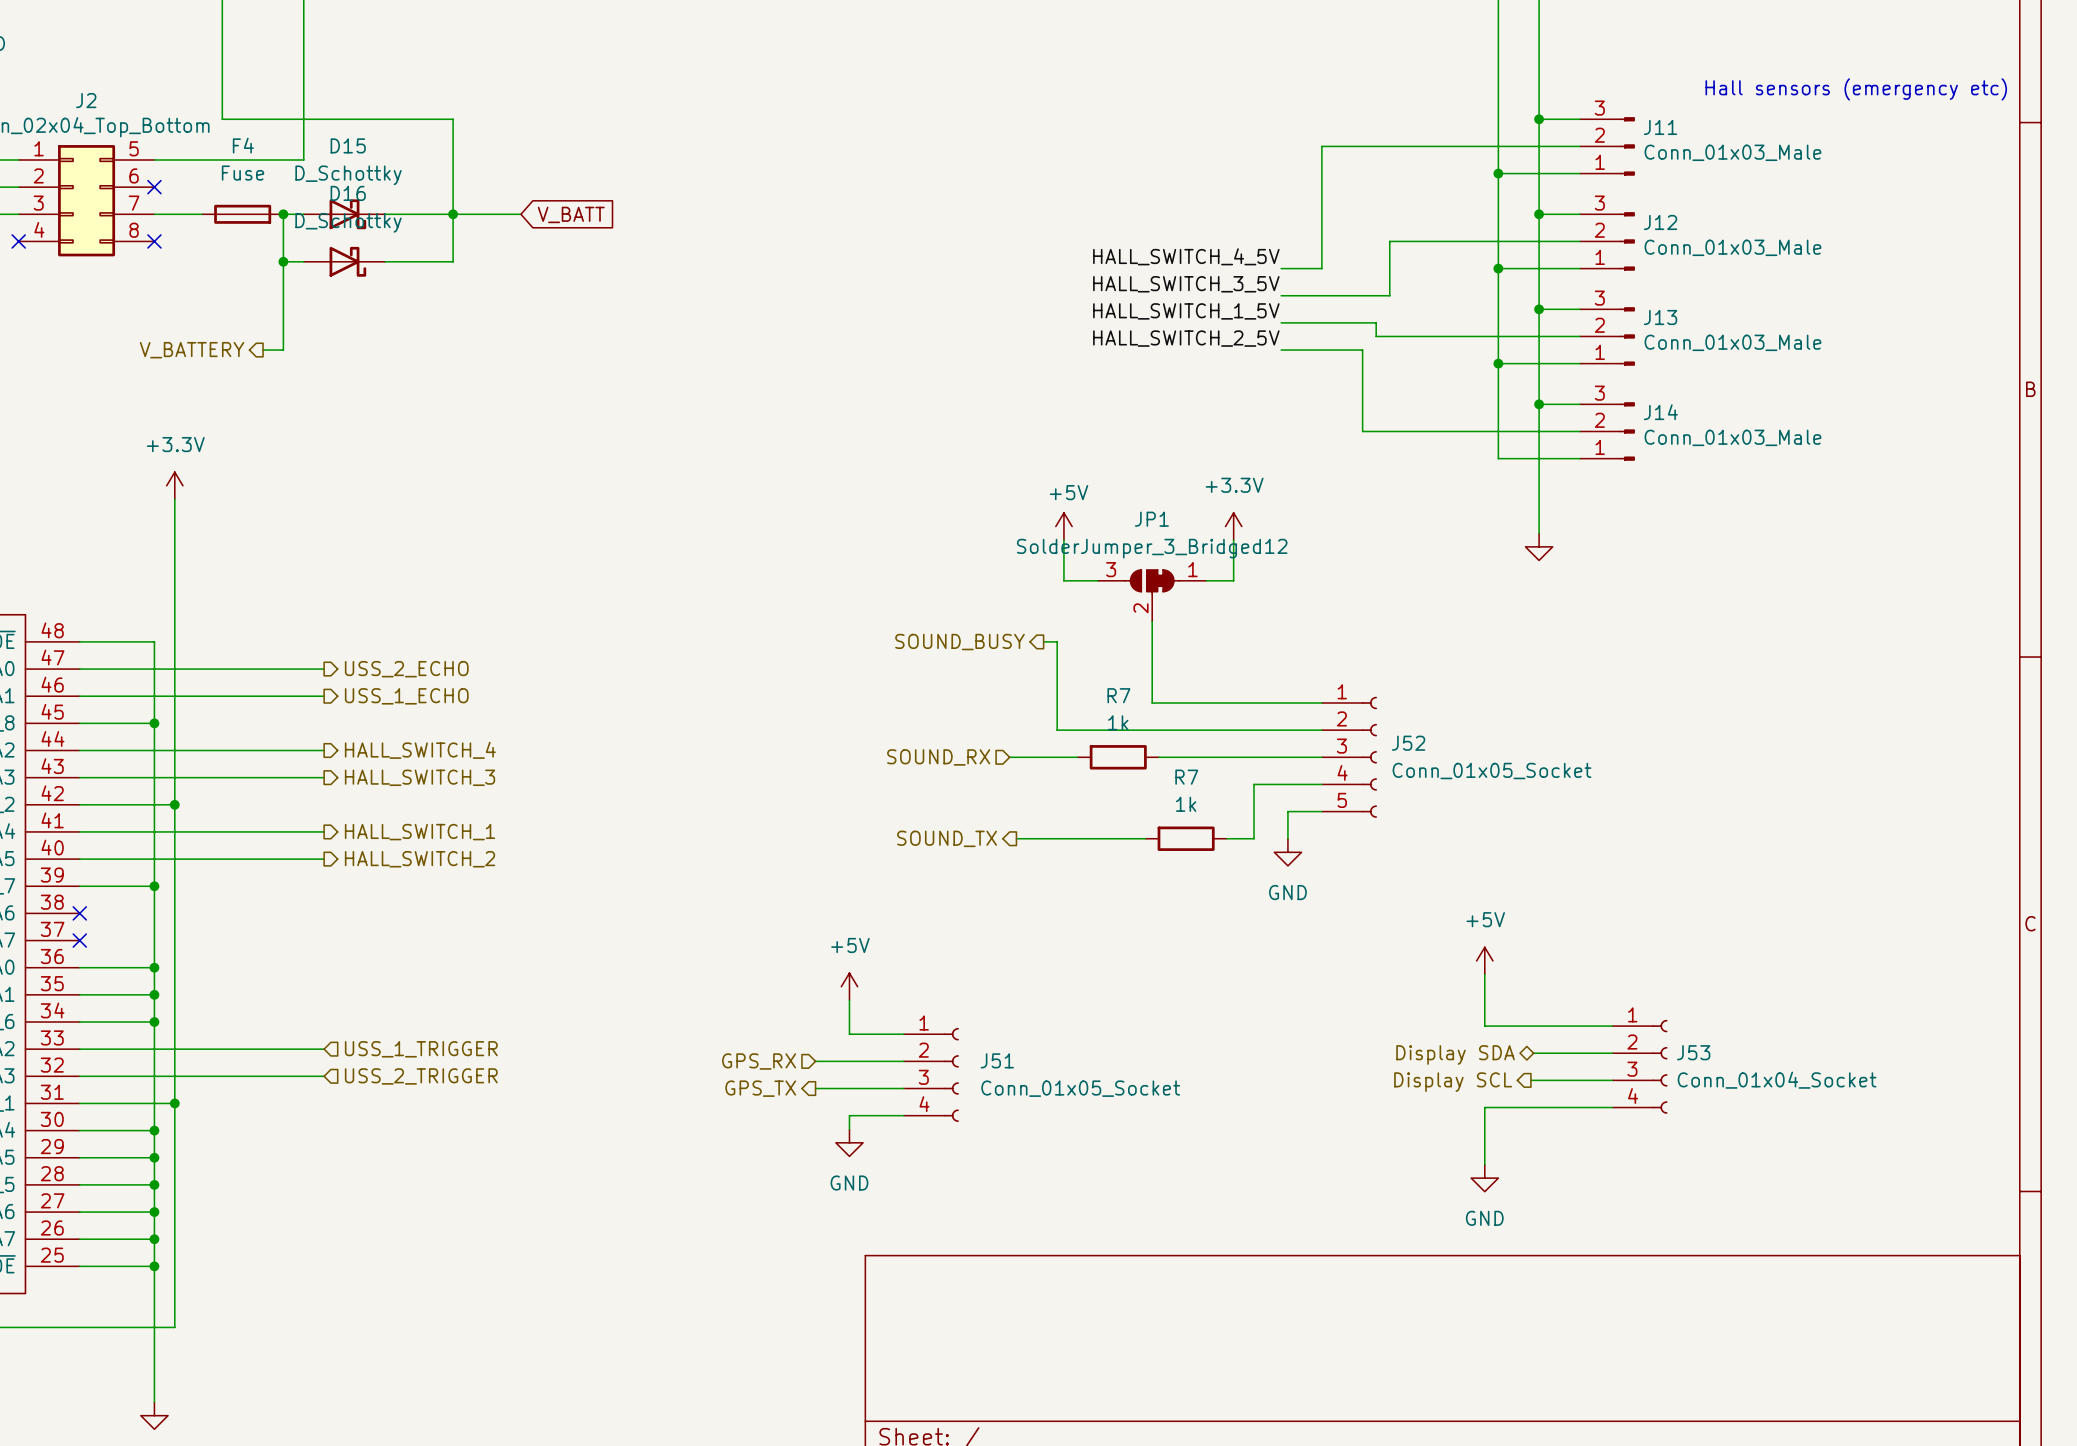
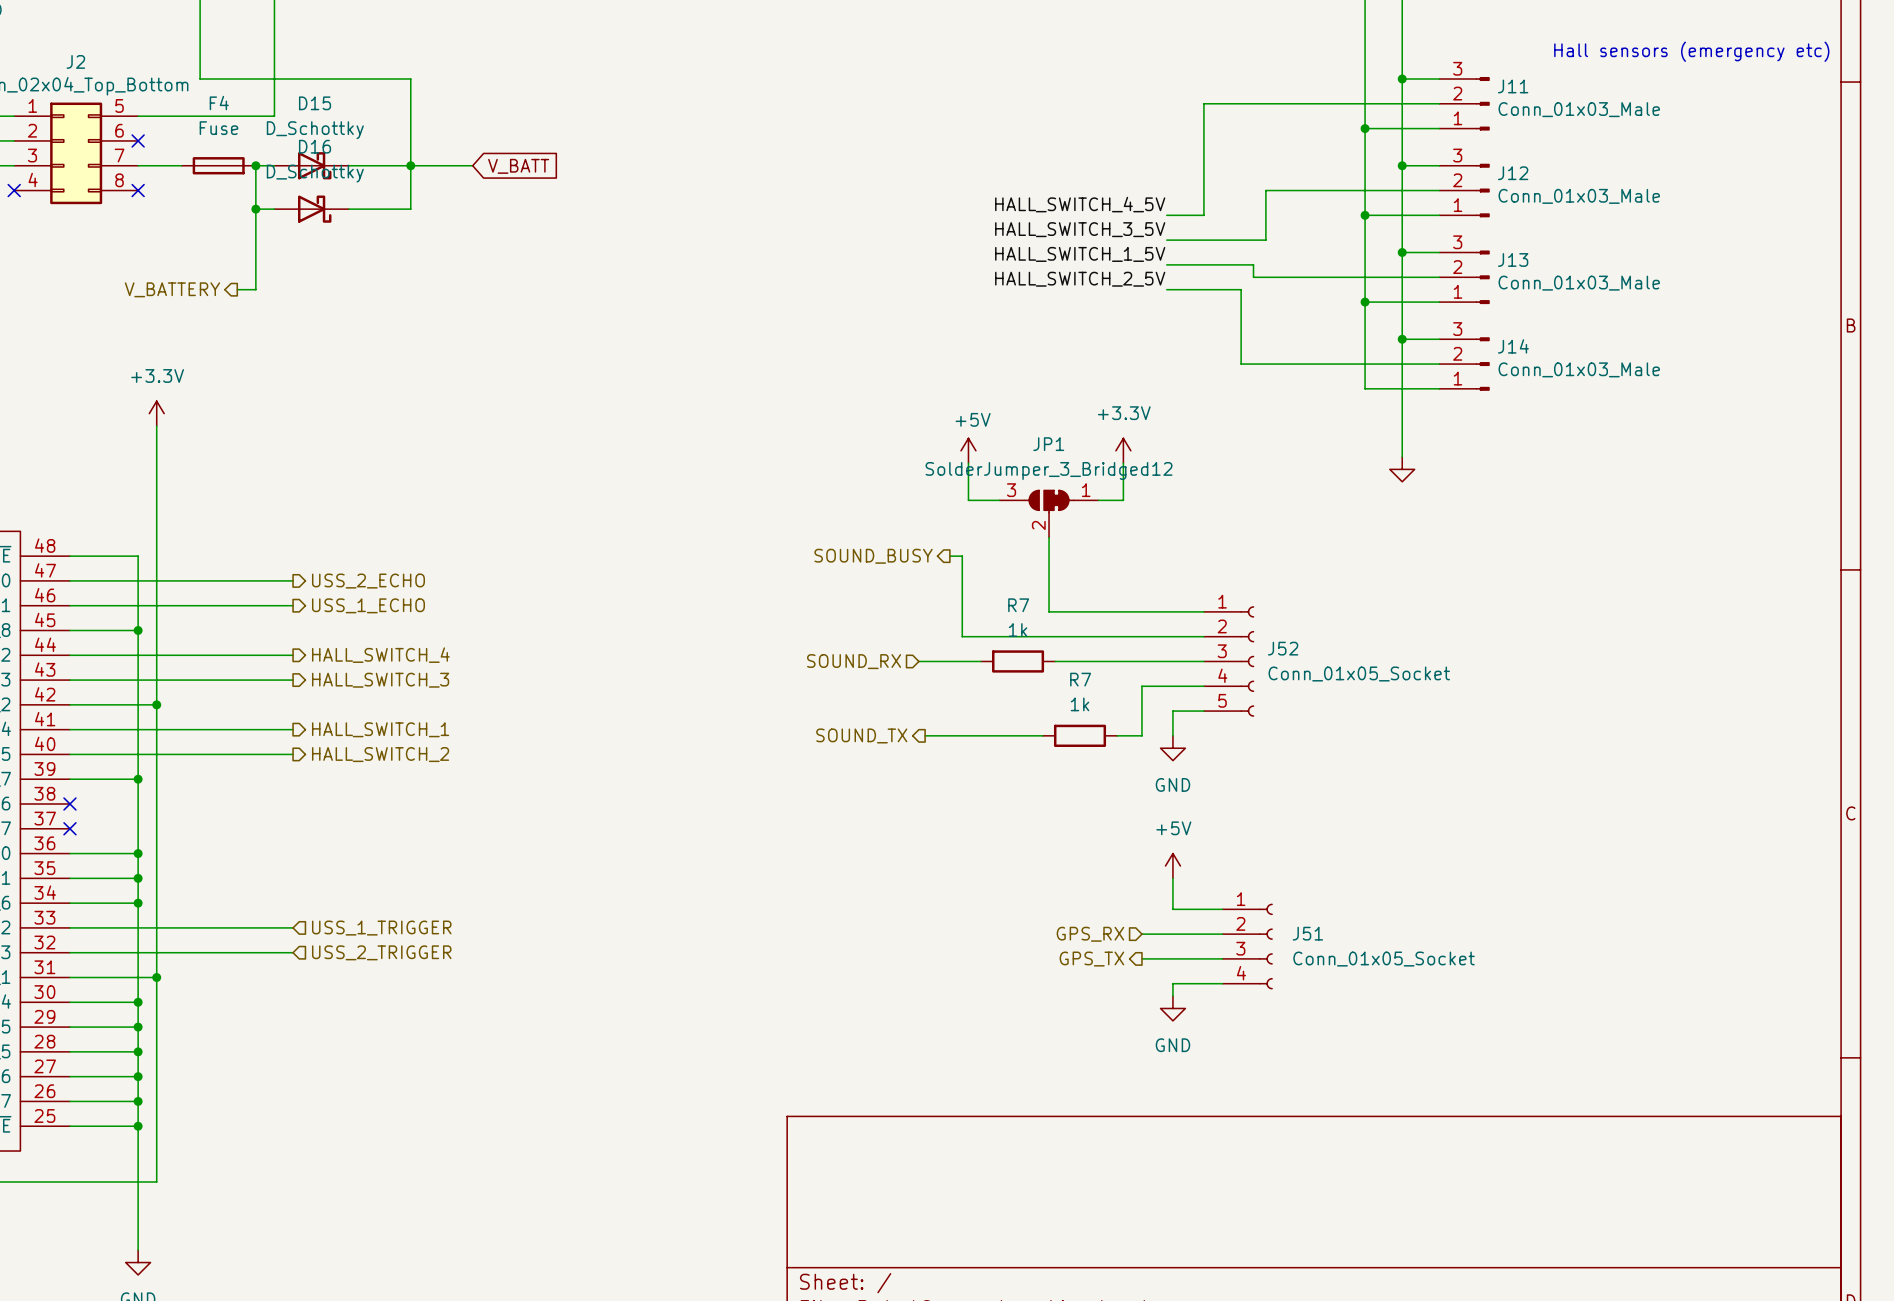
power symbol position: +5V (1484, 960) -> +5V (1172, 865)
wire: (1484, 974) (1484, 1026) (1612, 1026) -> none
power symbol: +5V (849, 986) -> none
wire: none -> (1172, 878) (1172, 909) (1222, 909)
wire: (849, 1000) (849, 1034) (903, 1034) -> none
wire: (1533, 1053) (1612, 1053) -> none
hierarchical label: Display SDA (1455, 1054) -> none
wire: none -> (1141, 934) (1222, 934)
hierarchical label: none -> GPS_RX (1090, 934)
hierarchical label: GPS_RX (759, 1061) -> none
wire: (815, 1061) (903, 1061) -> none
J53: Conn_01x04_Socket (1639, 1066) -> none
J51 position: (931, 1074) -> (1247, 946)
wire: (1530, 1080) (1612, 1080) -> none
hierarchical label: Display SCL (1453, 1082) -> none
hierarchical label: none -> GPS_TX (1091, 959)
wire: none -> (1141, 958) (1222, 958)
hierarchical label: GPS_TX (760, 1088) -> none
wire: (815, 1088) (903, 1088) -> none
wire: (1612, 1107) (1484, 1107) (1484, 1164) -> none
wire: none -> (1222, 983) (1172, 983) (1172, 996)
wire: (903, 1115) (849, 1115) (849, 1129) -> none
power symbol: GND (849, 1142) -> none
power symbol position: GND (1484, 1178) -> GND (1172, 1008)

